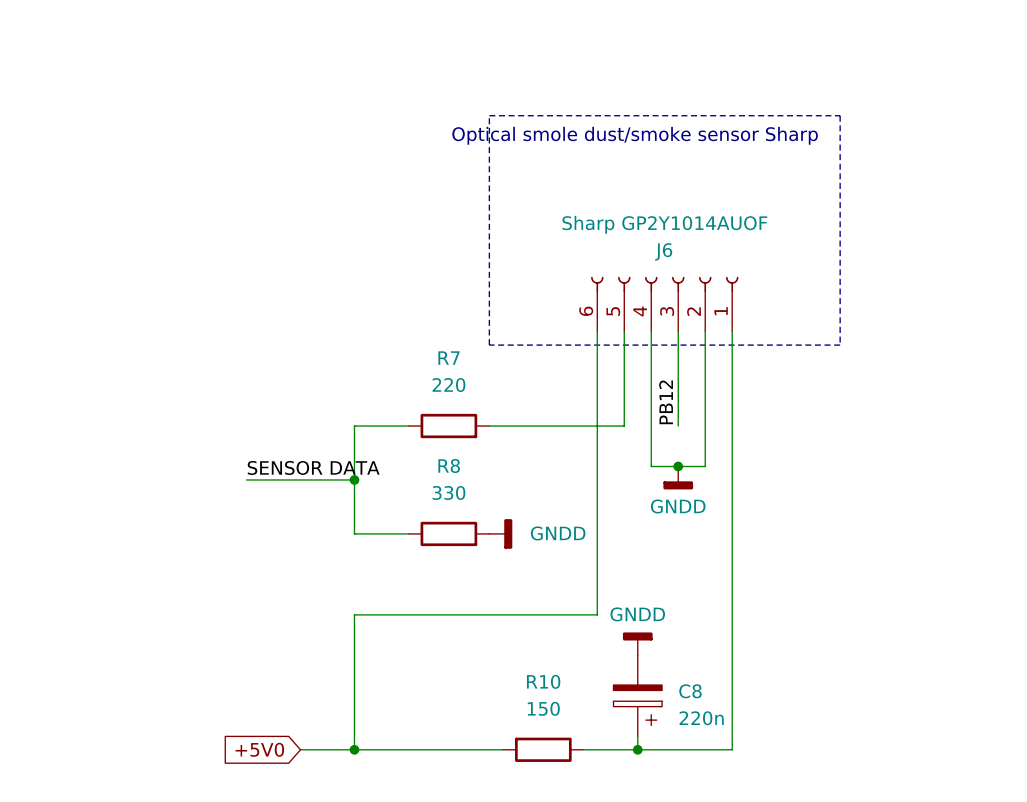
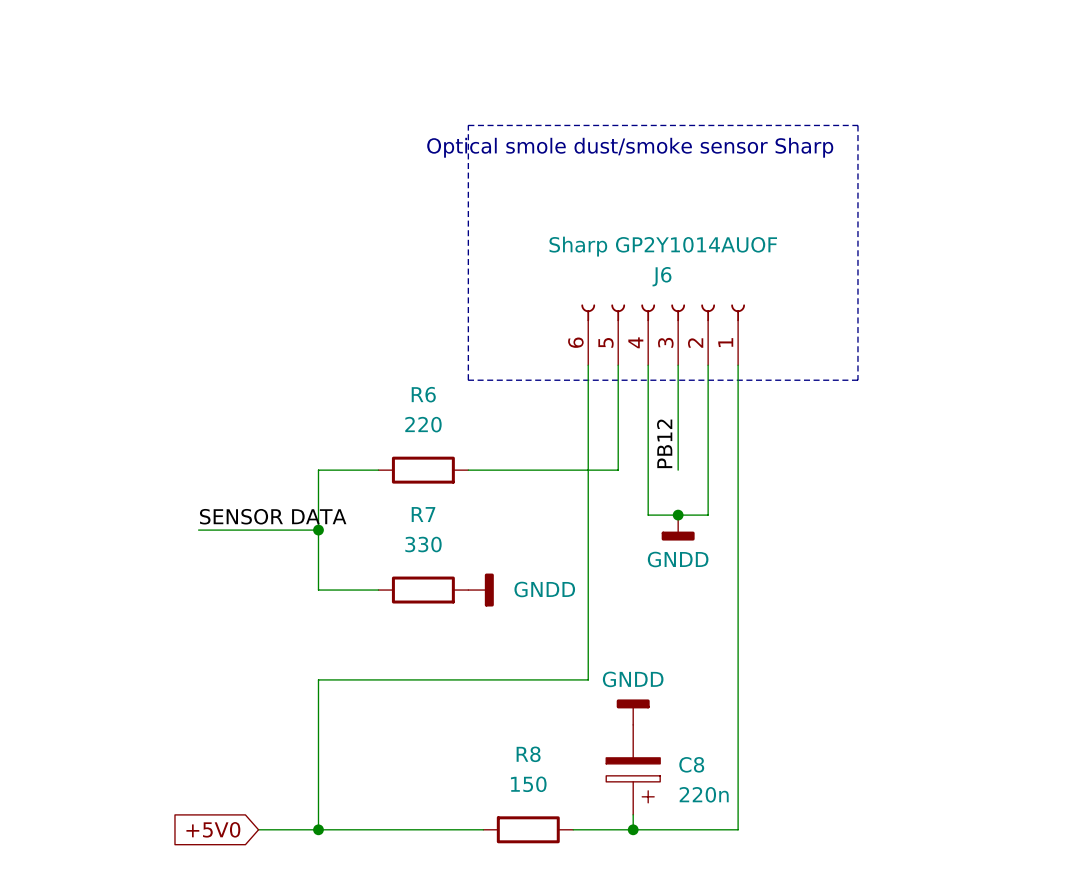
R7 name: R7 (449, 358) -> R6 (423, 394)
R8 name: R8 (449, 466) -> R7 (423, 514)
R10 name: R10 (543, 681) -> R8 (528, 754)

